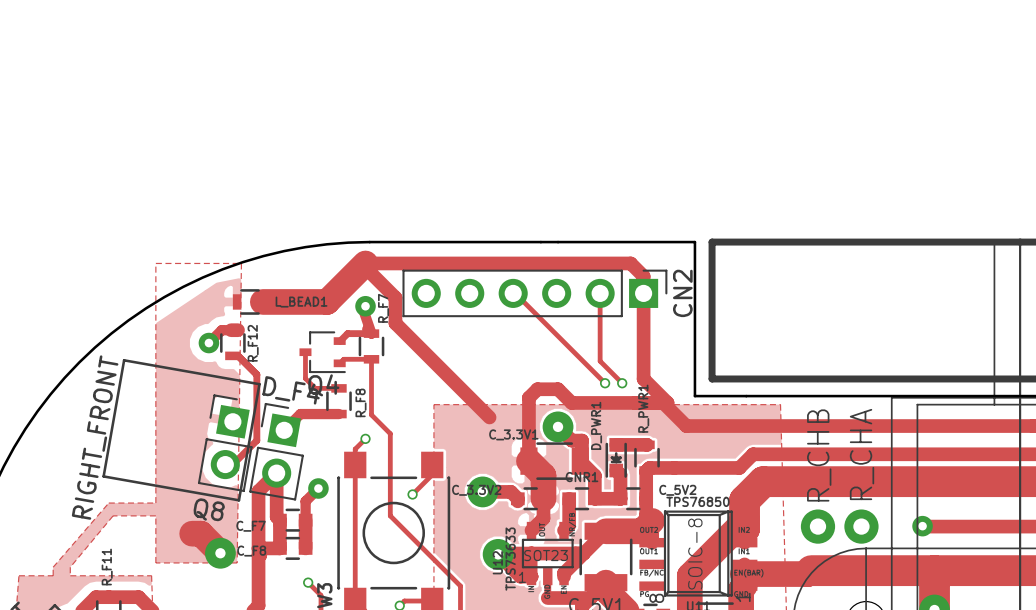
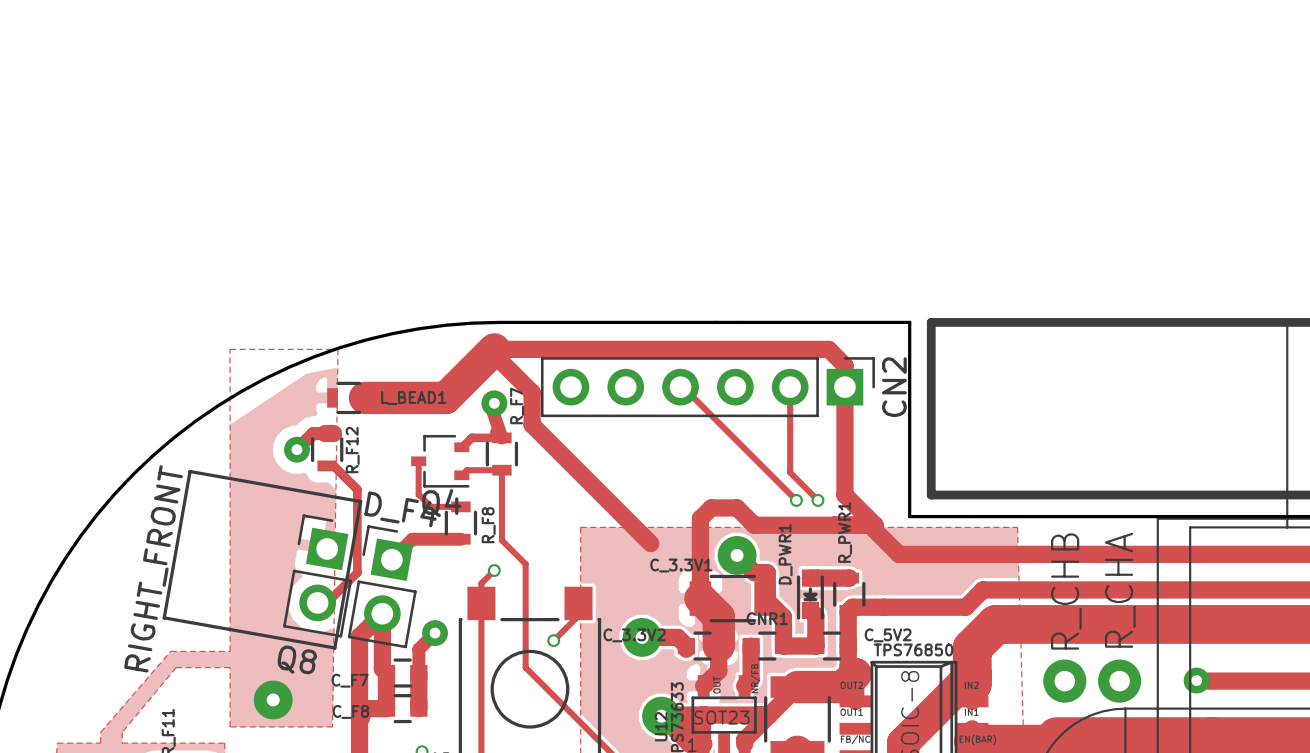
track: (192, 533) (200, 533) (220, 553) -> none
via position: (220, 553) -> (273, 699)

